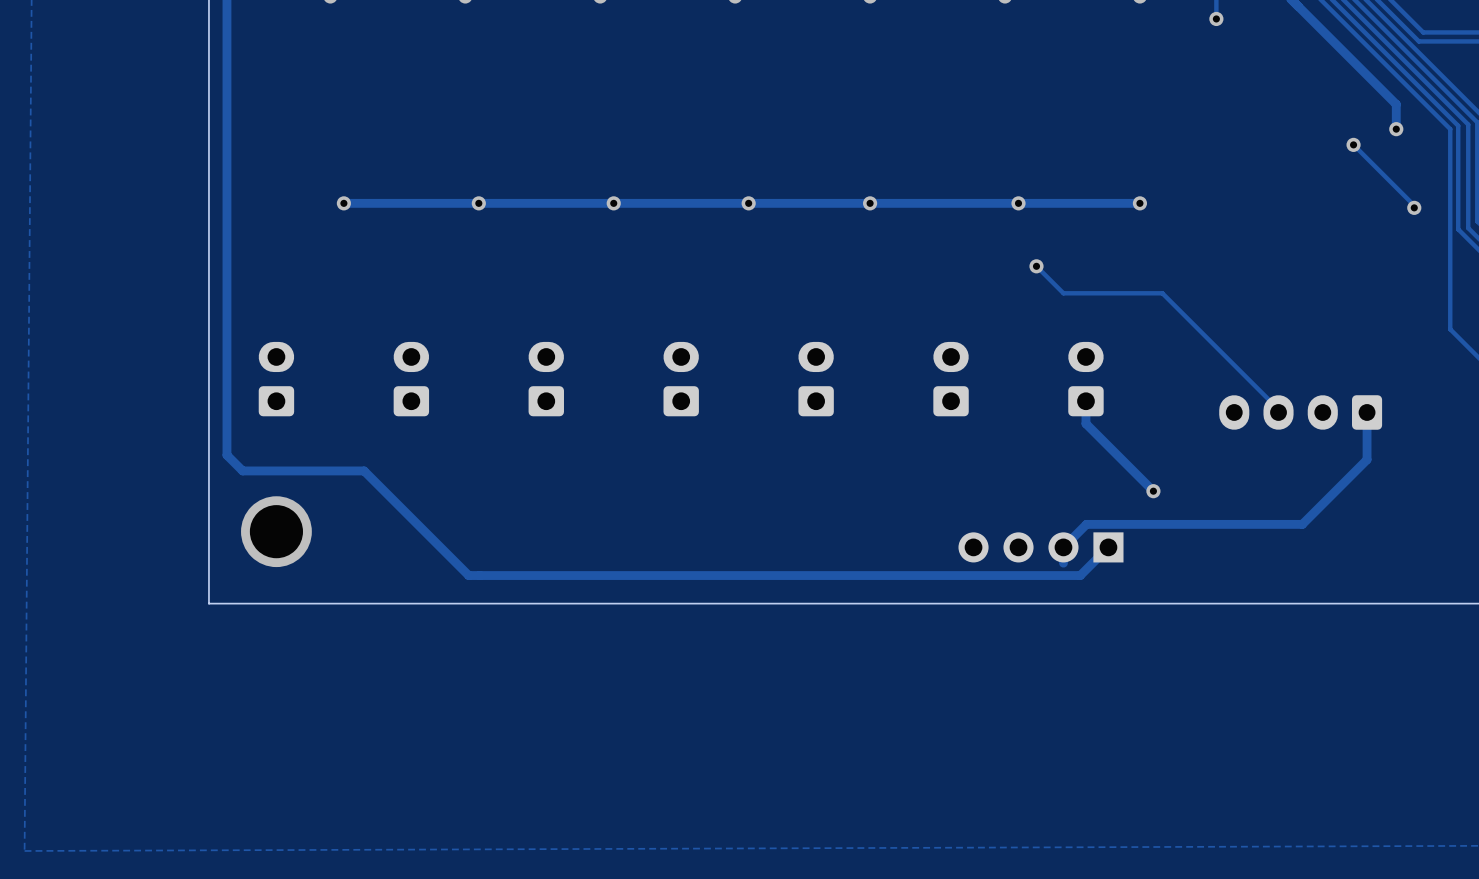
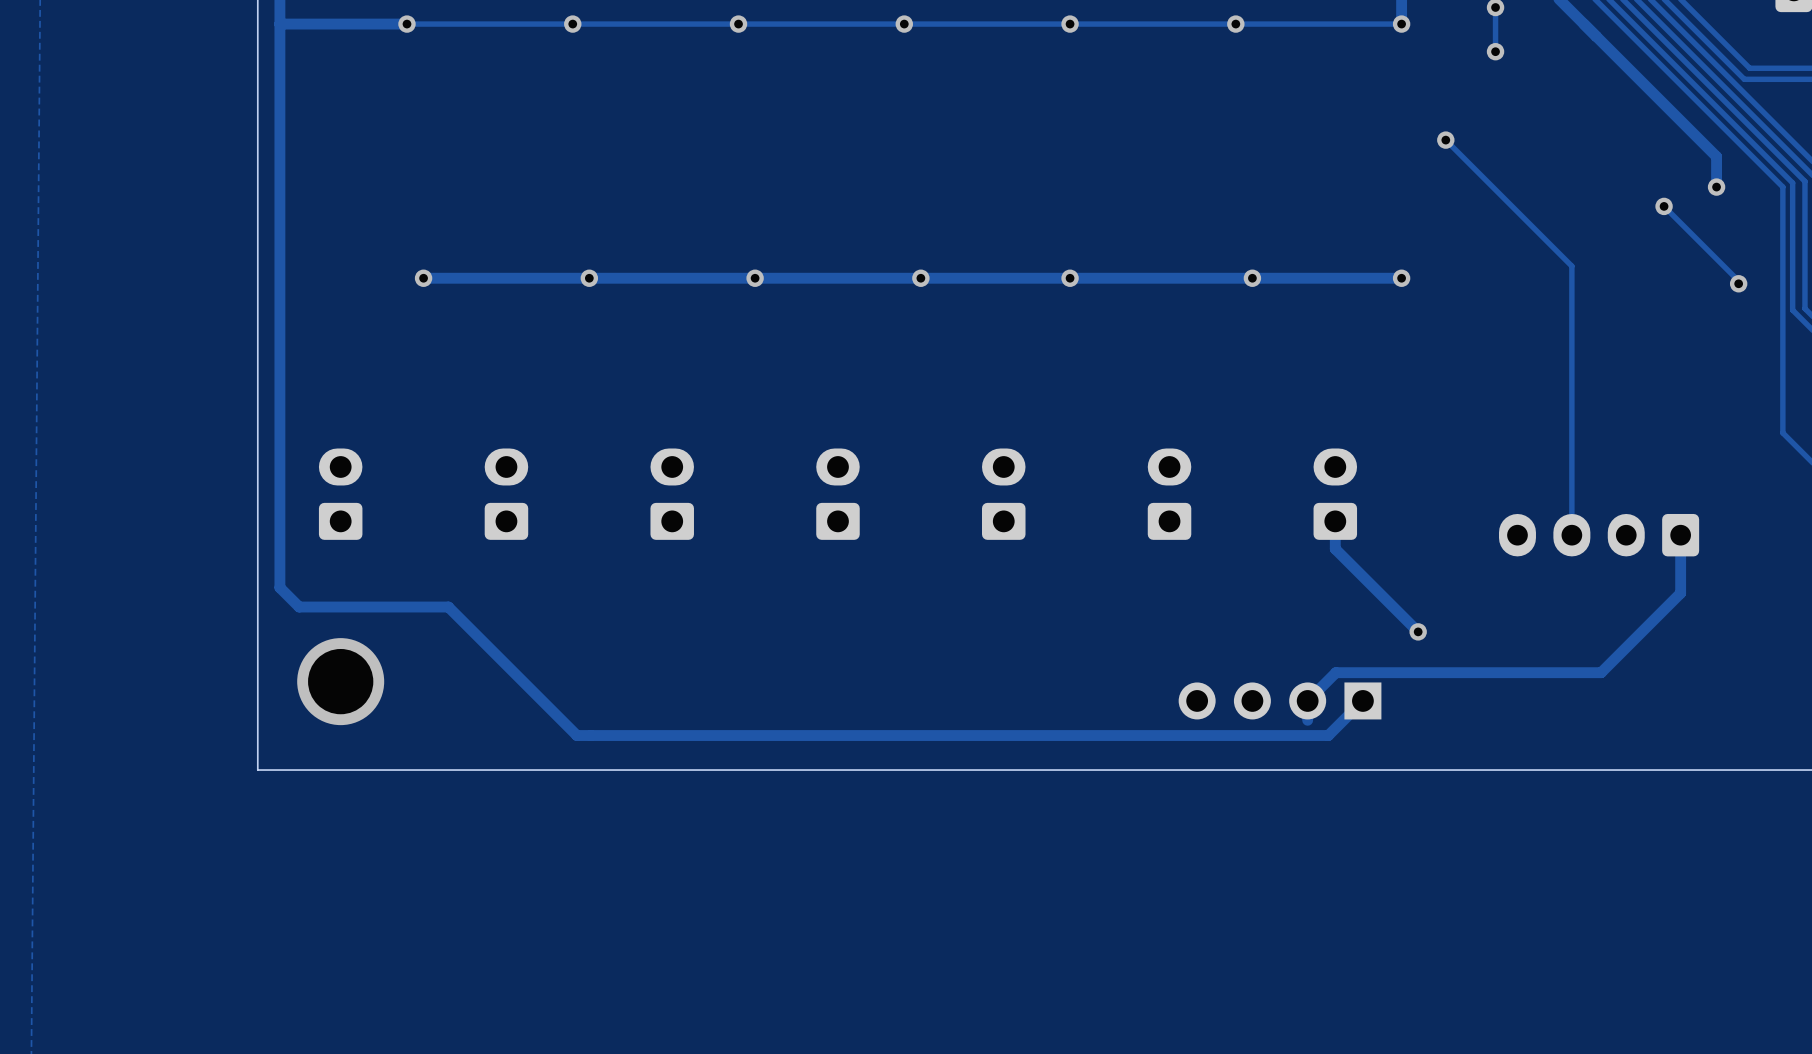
via: none -> (1445, 140)
track: (1036, 266) (1063, 293) (1162, 293) (1278, 409) -> (1445, 140) (1571, 266) (1571, 531)
via: (1036, 266) -> none

